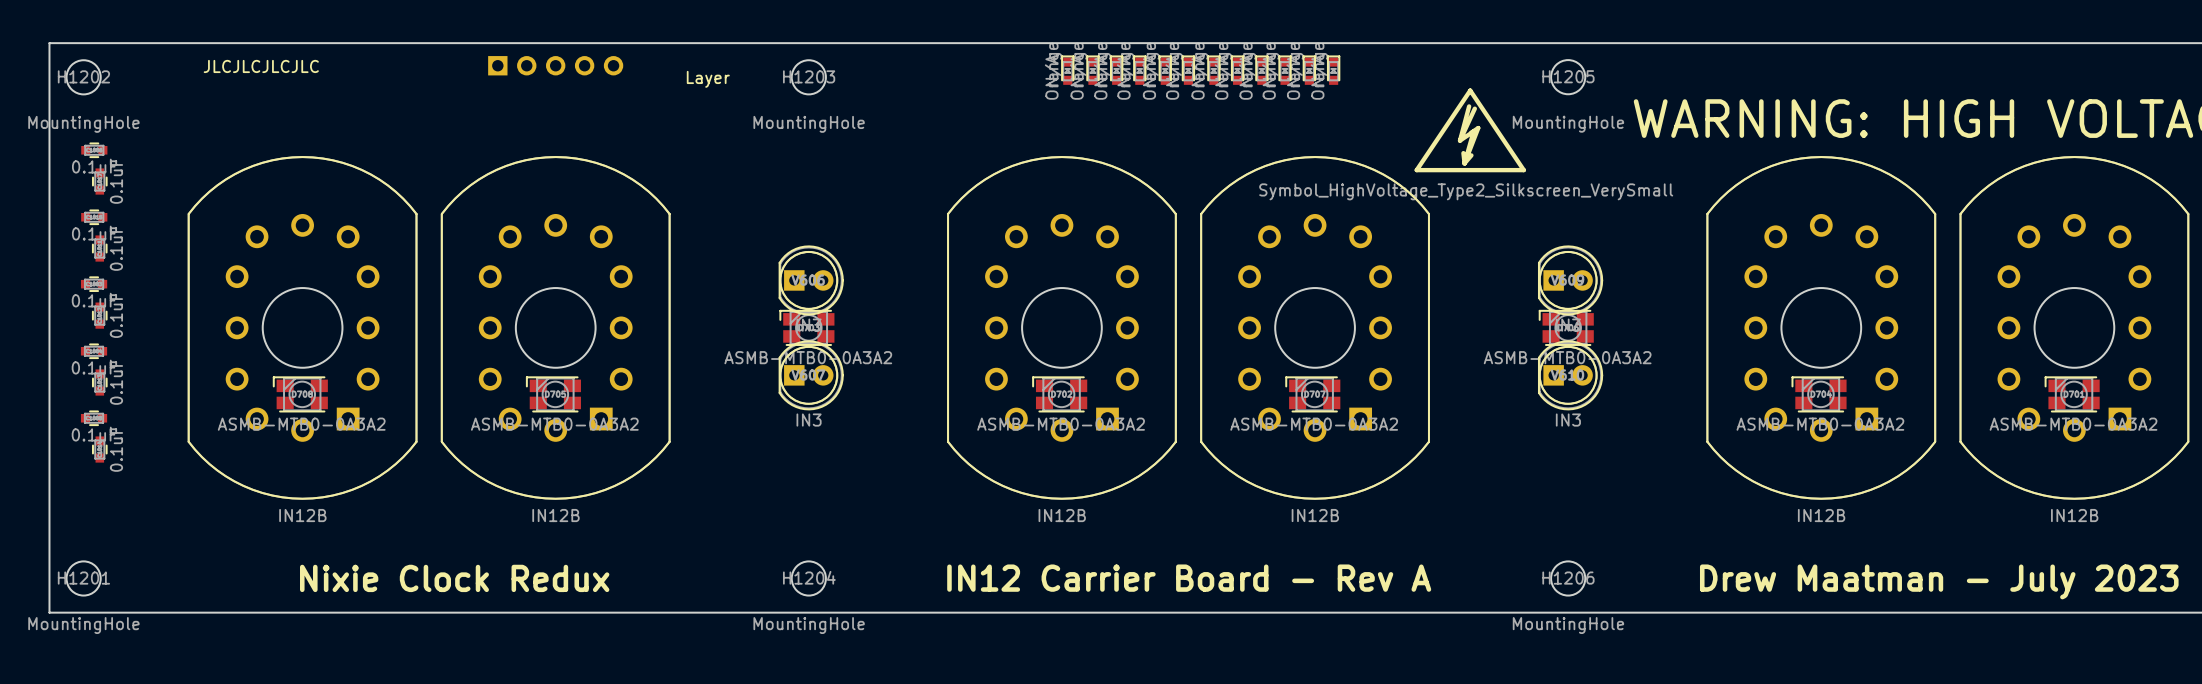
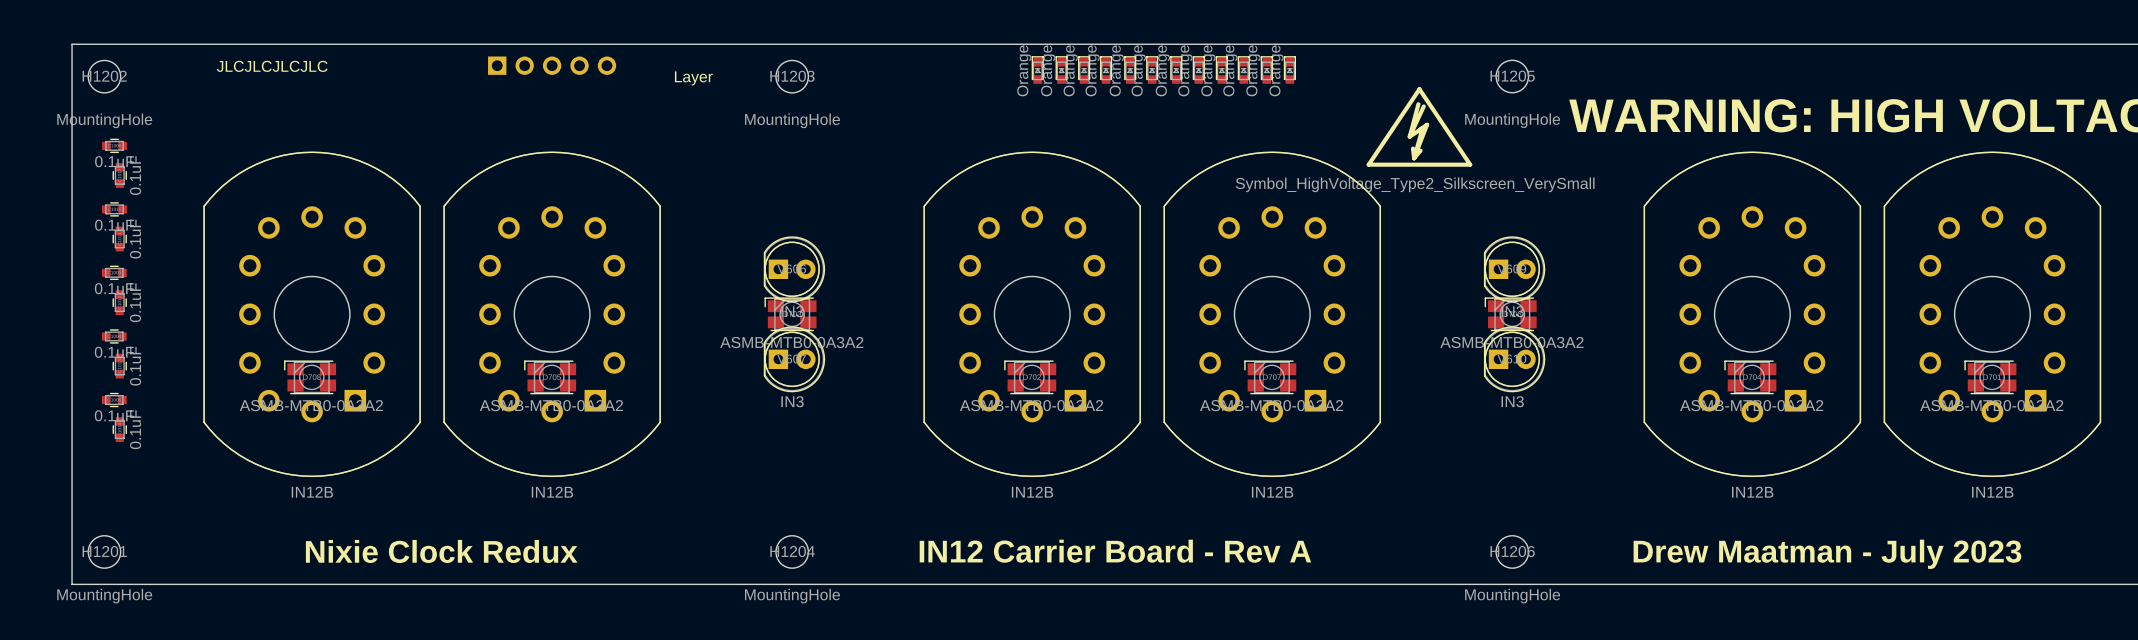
drawing: [1044, 54, 1328, 87] -> none

